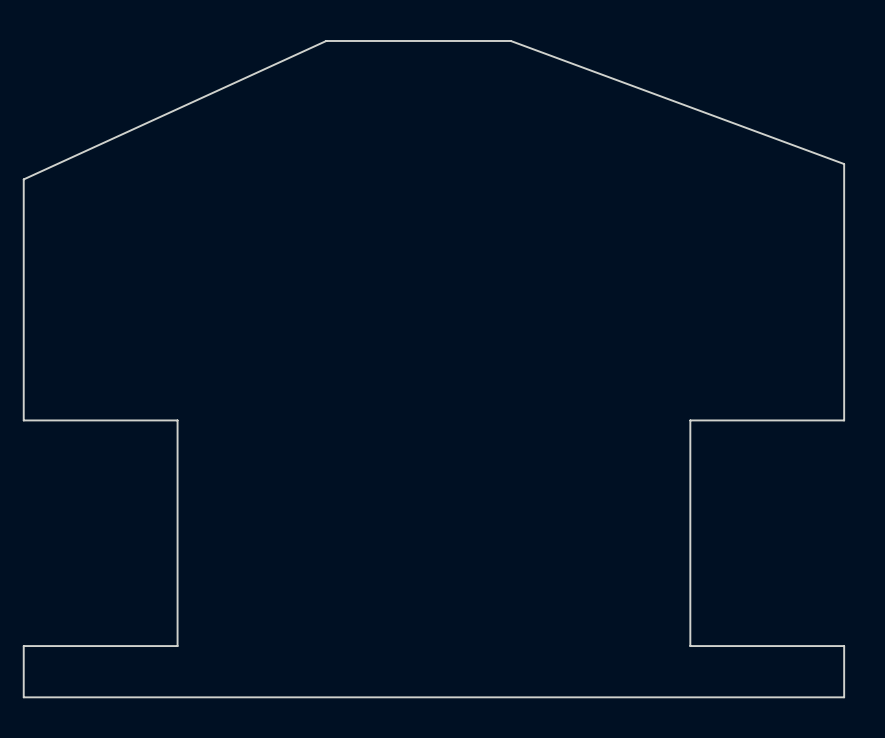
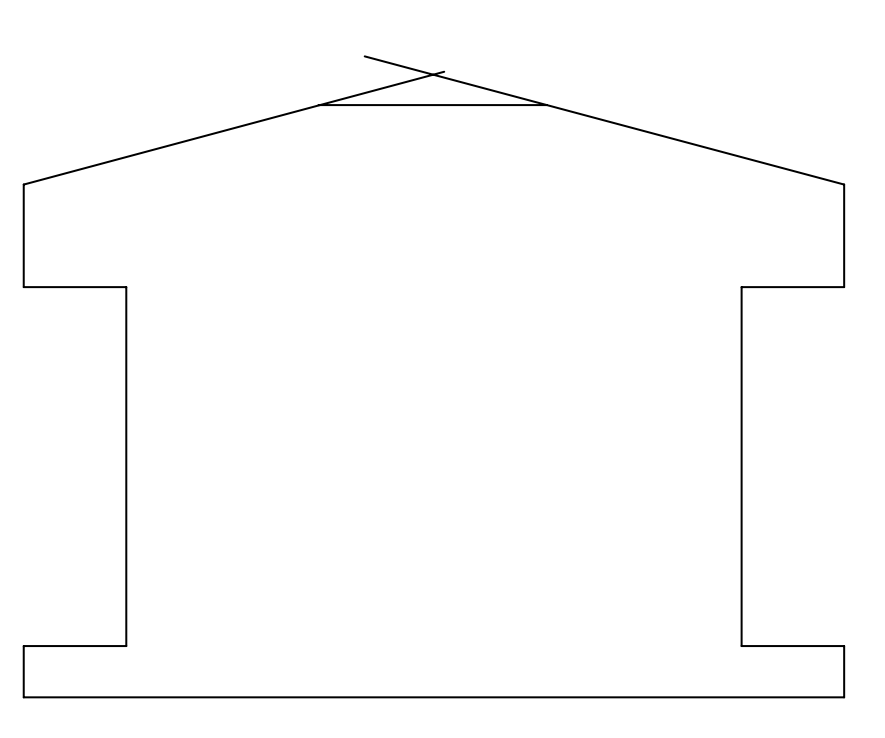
board edge: none -> (444, 71) (23, 184)
board edge: none -> (318, 105) (546, 105)
board edge: (23, 184) (23, 179) (326, 40) (510, 40) (844, 164) (844, 184) -> (364, 56) (844, 184)
board edge: (23, 287) (23, 420) (177, 420) (177, 646) (126, 646) -> (23, 287) (126, 287) (126, 646)
board edge: (844, 287) (844, 420) (690, 420) (690, 646) (741, 646) -> (844, 287) (741, 287) (741, 646)

